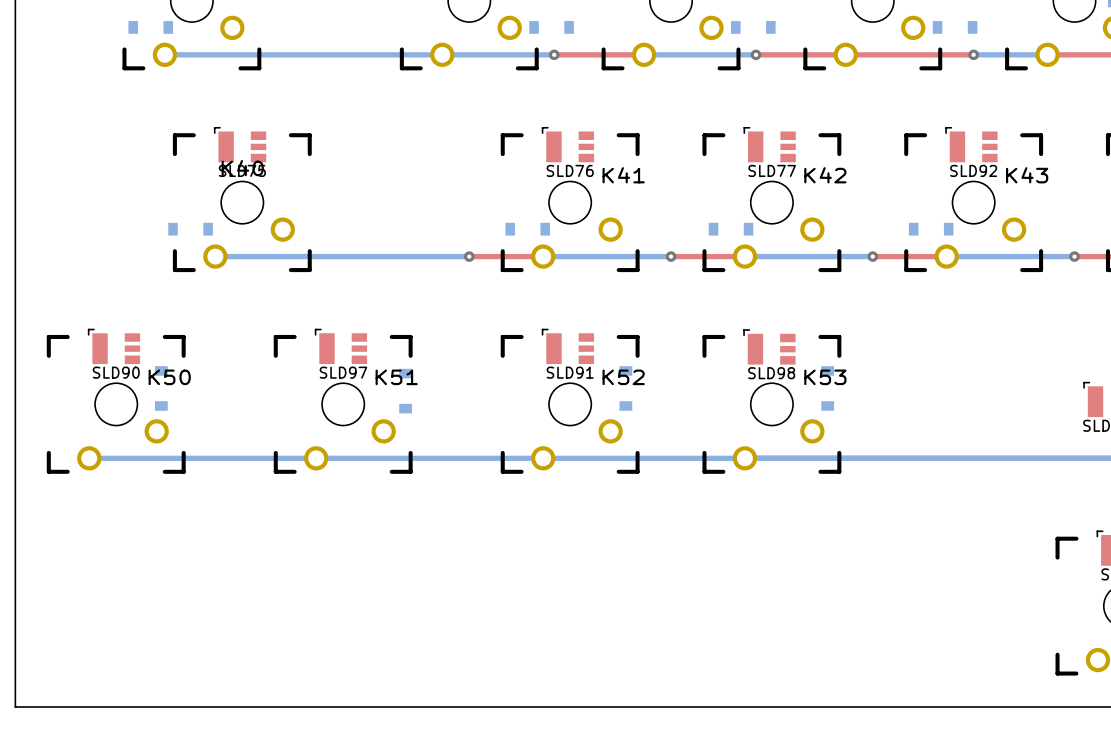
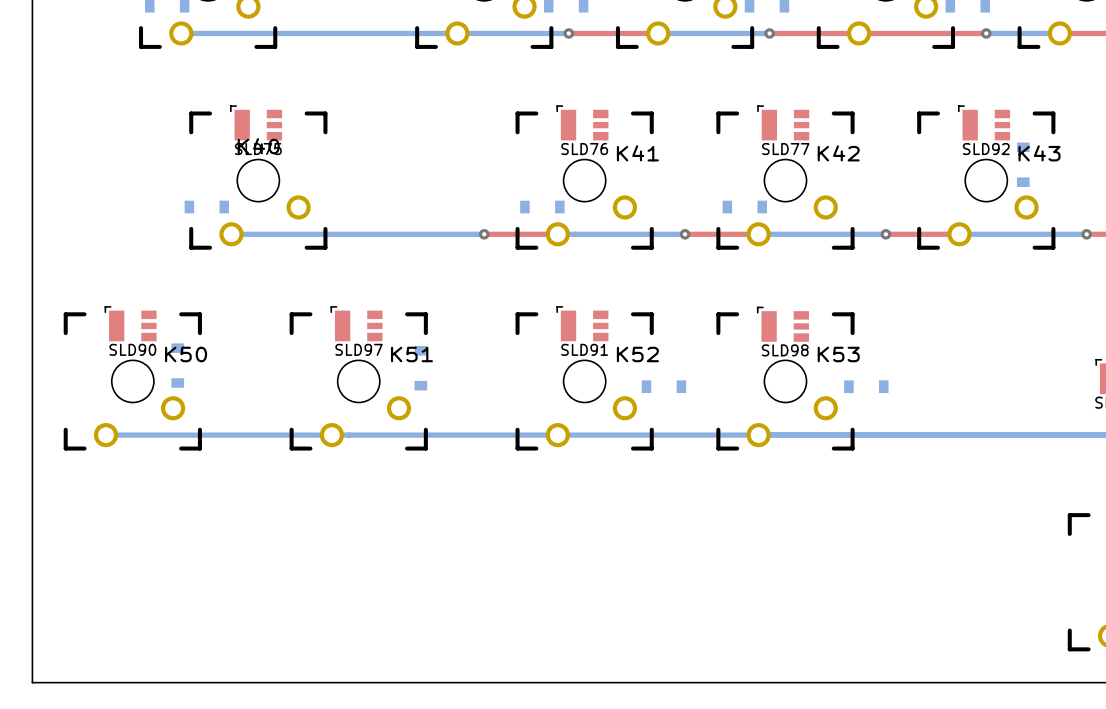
part rotation: 0° (931, 229) -> 90° clockwise (1023, 164)
part position: (931, 229) -> (1023, 164)
part rotation: 0° (625, 388) -> 90° clockwise (663, 386)
part position: (625, 388) -> (663, 386)
part rotation: 0° (827, 388) -> 90° clockwise (866, 386)
part position: (827, 388) -> (866, 386)

